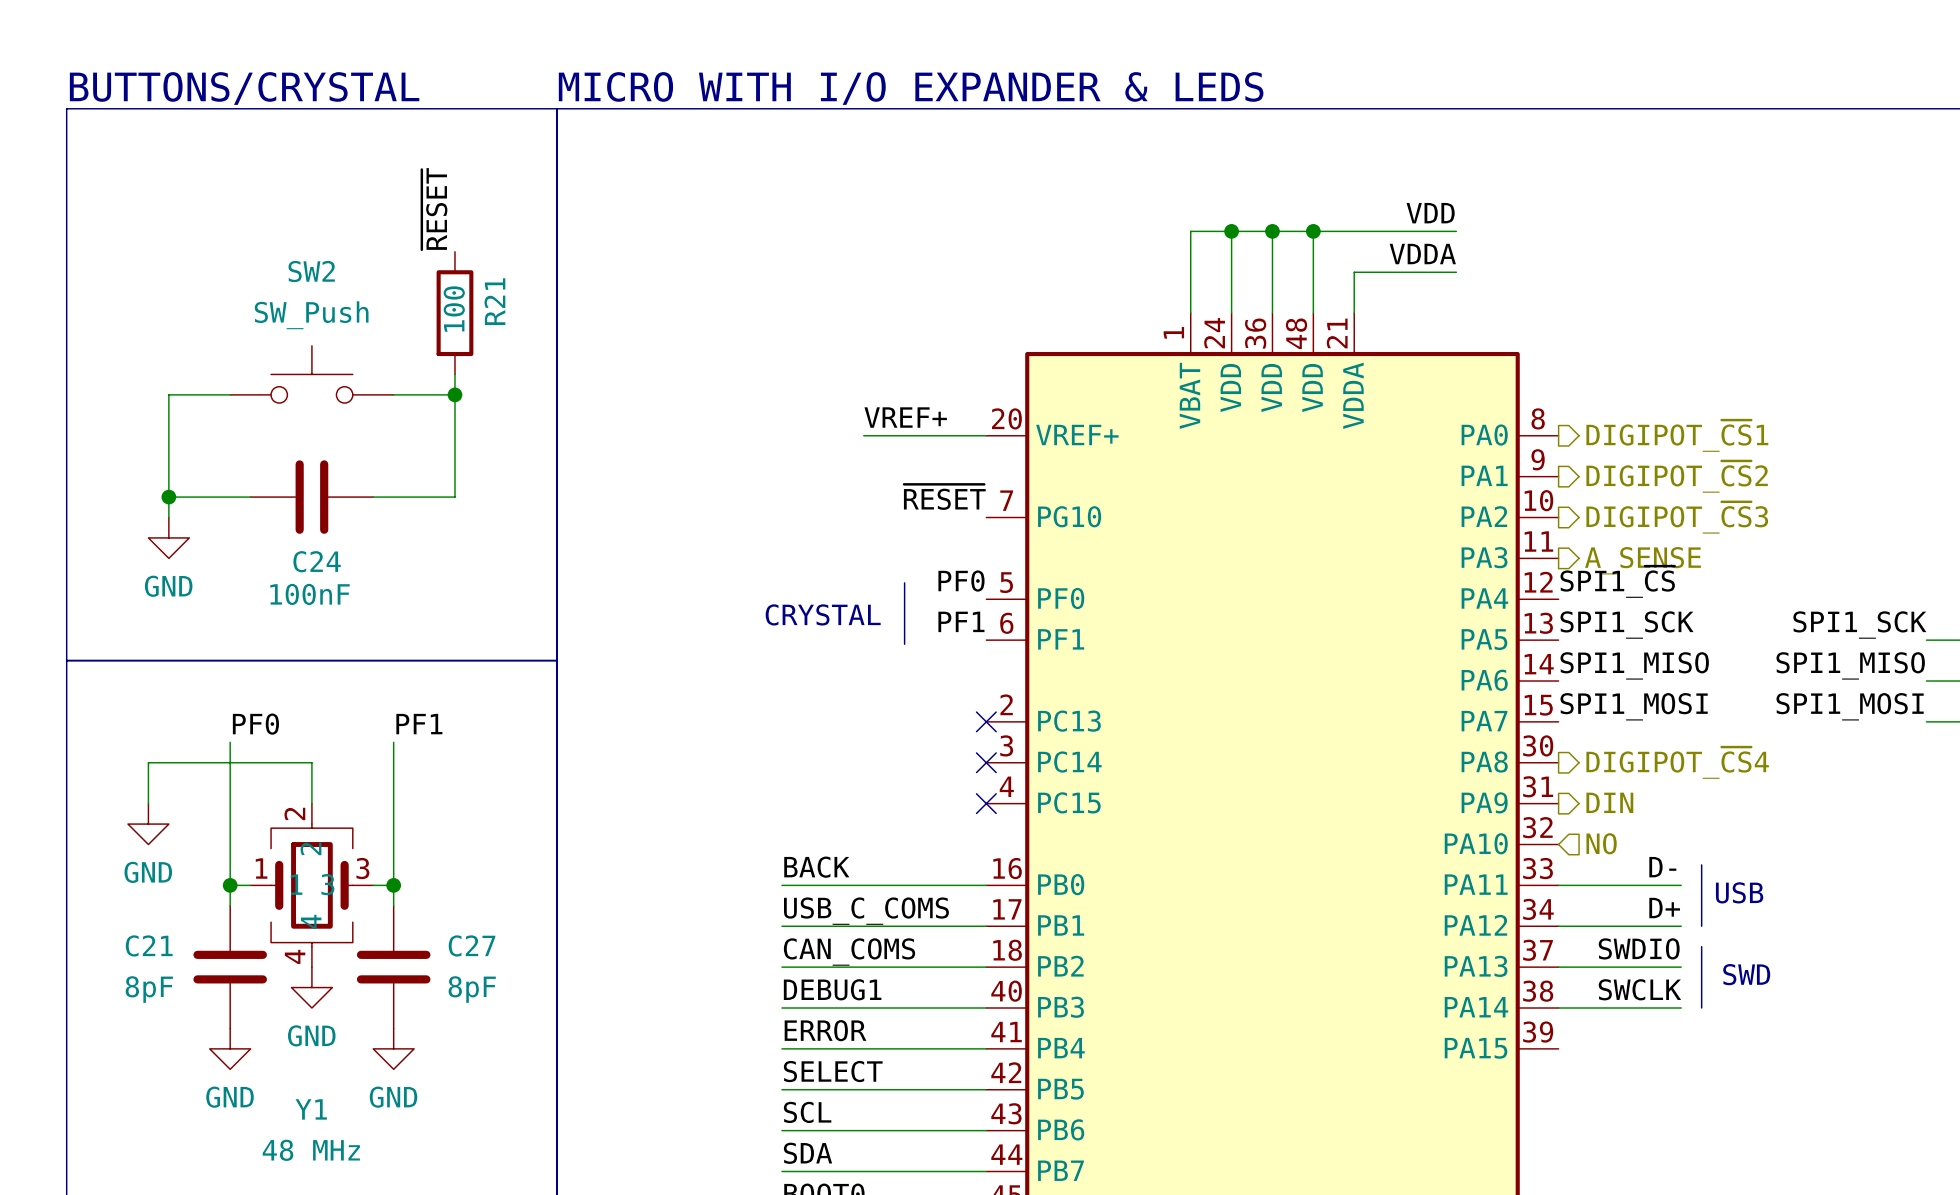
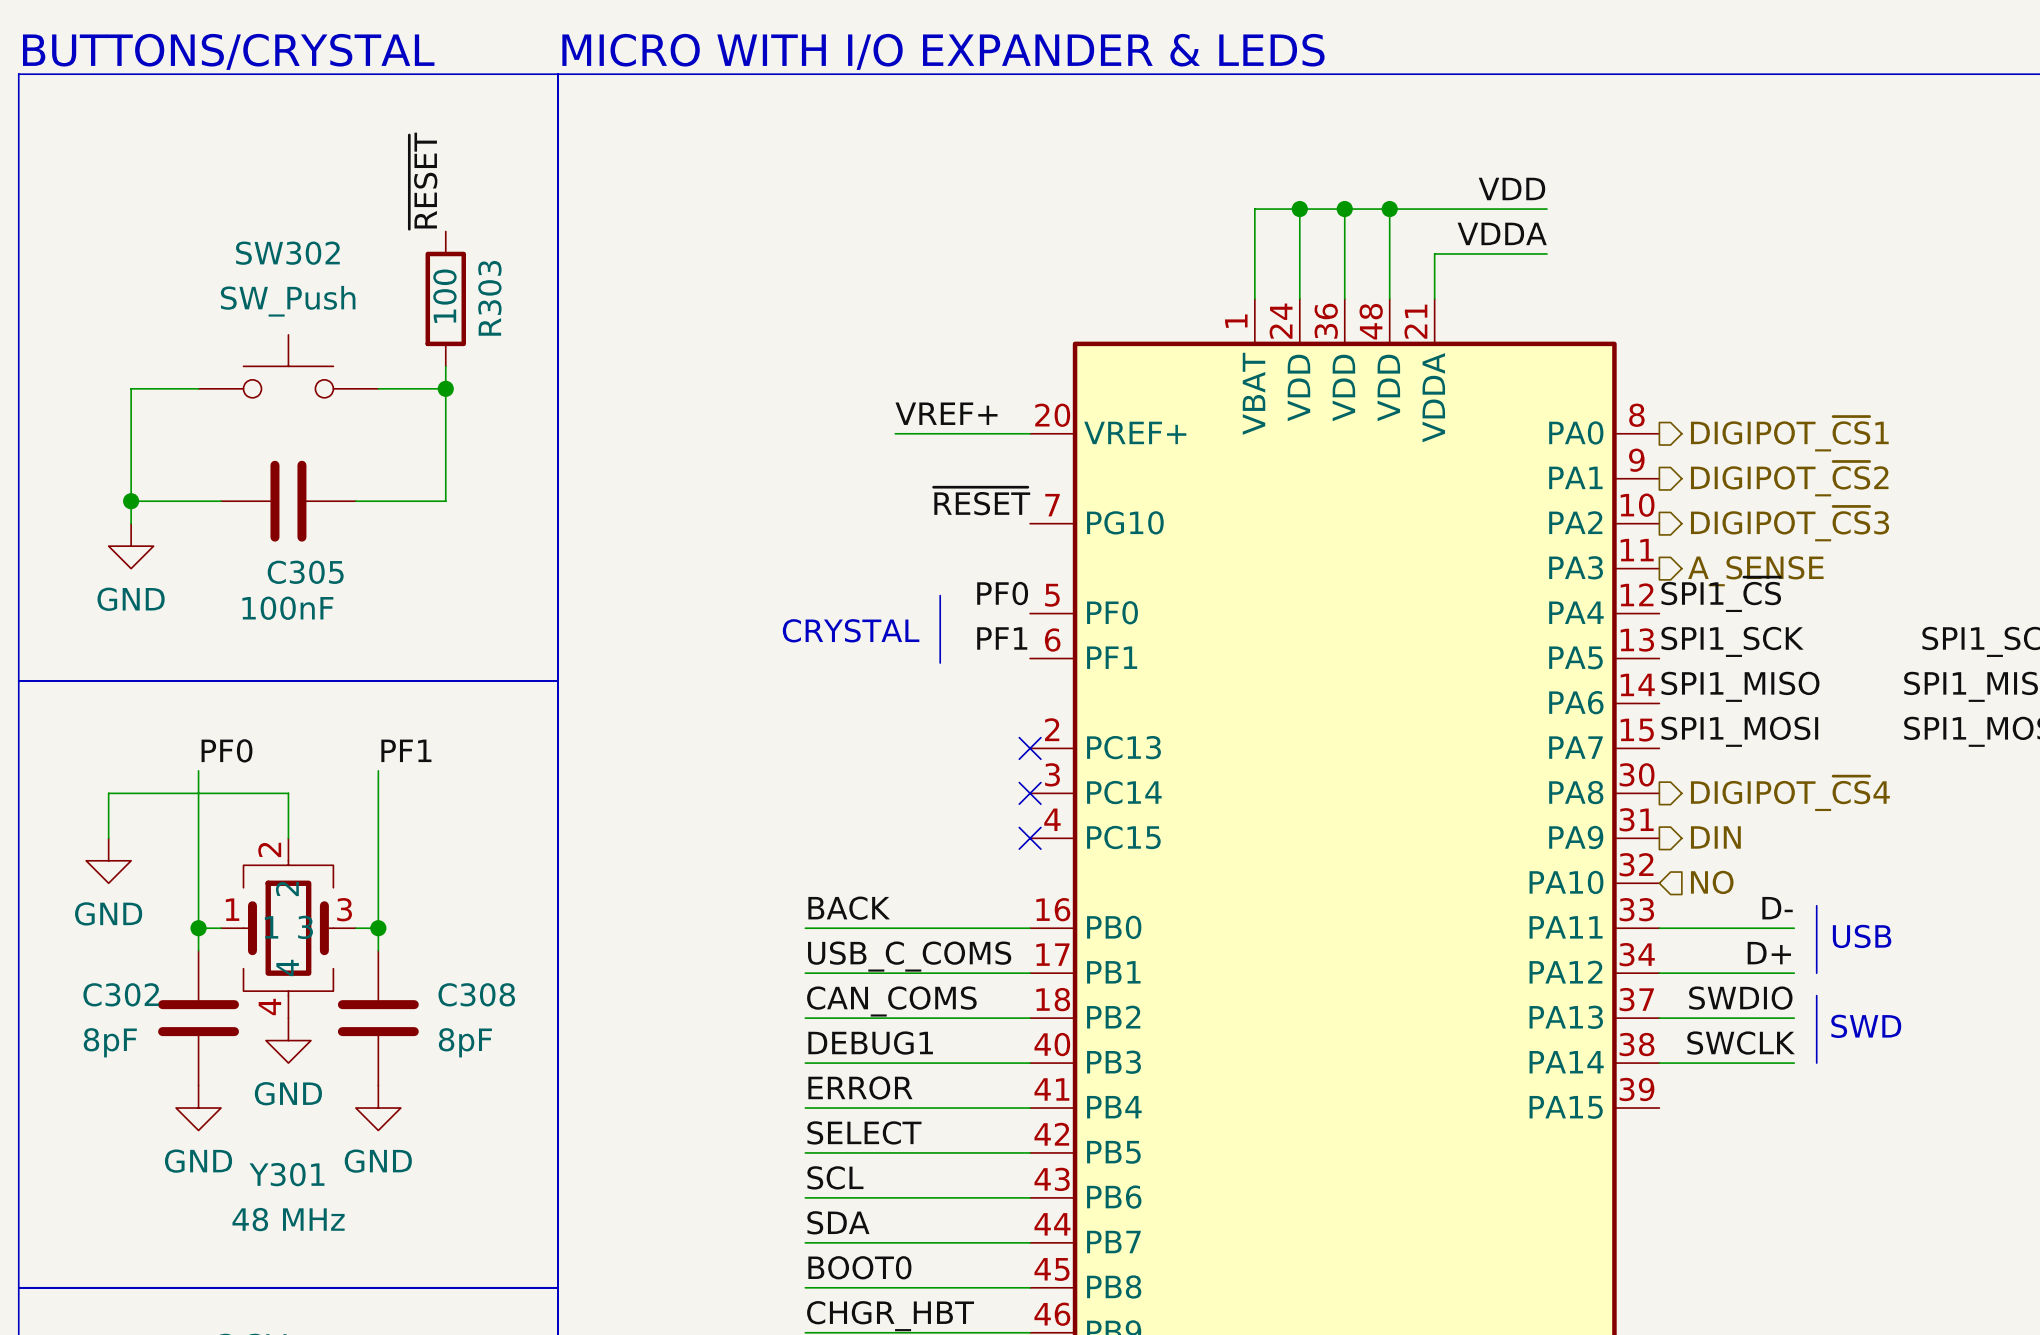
SW2 name: SW2 (311, 271) -> SW302 (287, 253)
R21 name: R21 (494, 301) -> R303 (489, 298)
C24 name: C24 (317, 561) -> C305 (305, 572)
C21 name: C21 (149, 945) -> C302 (121, 994)
C27 name: C27 (472, 945) -> C308 (476, 994)
Y1 name: Y1 (311, 1109) -> Y301 (286, 1174)

